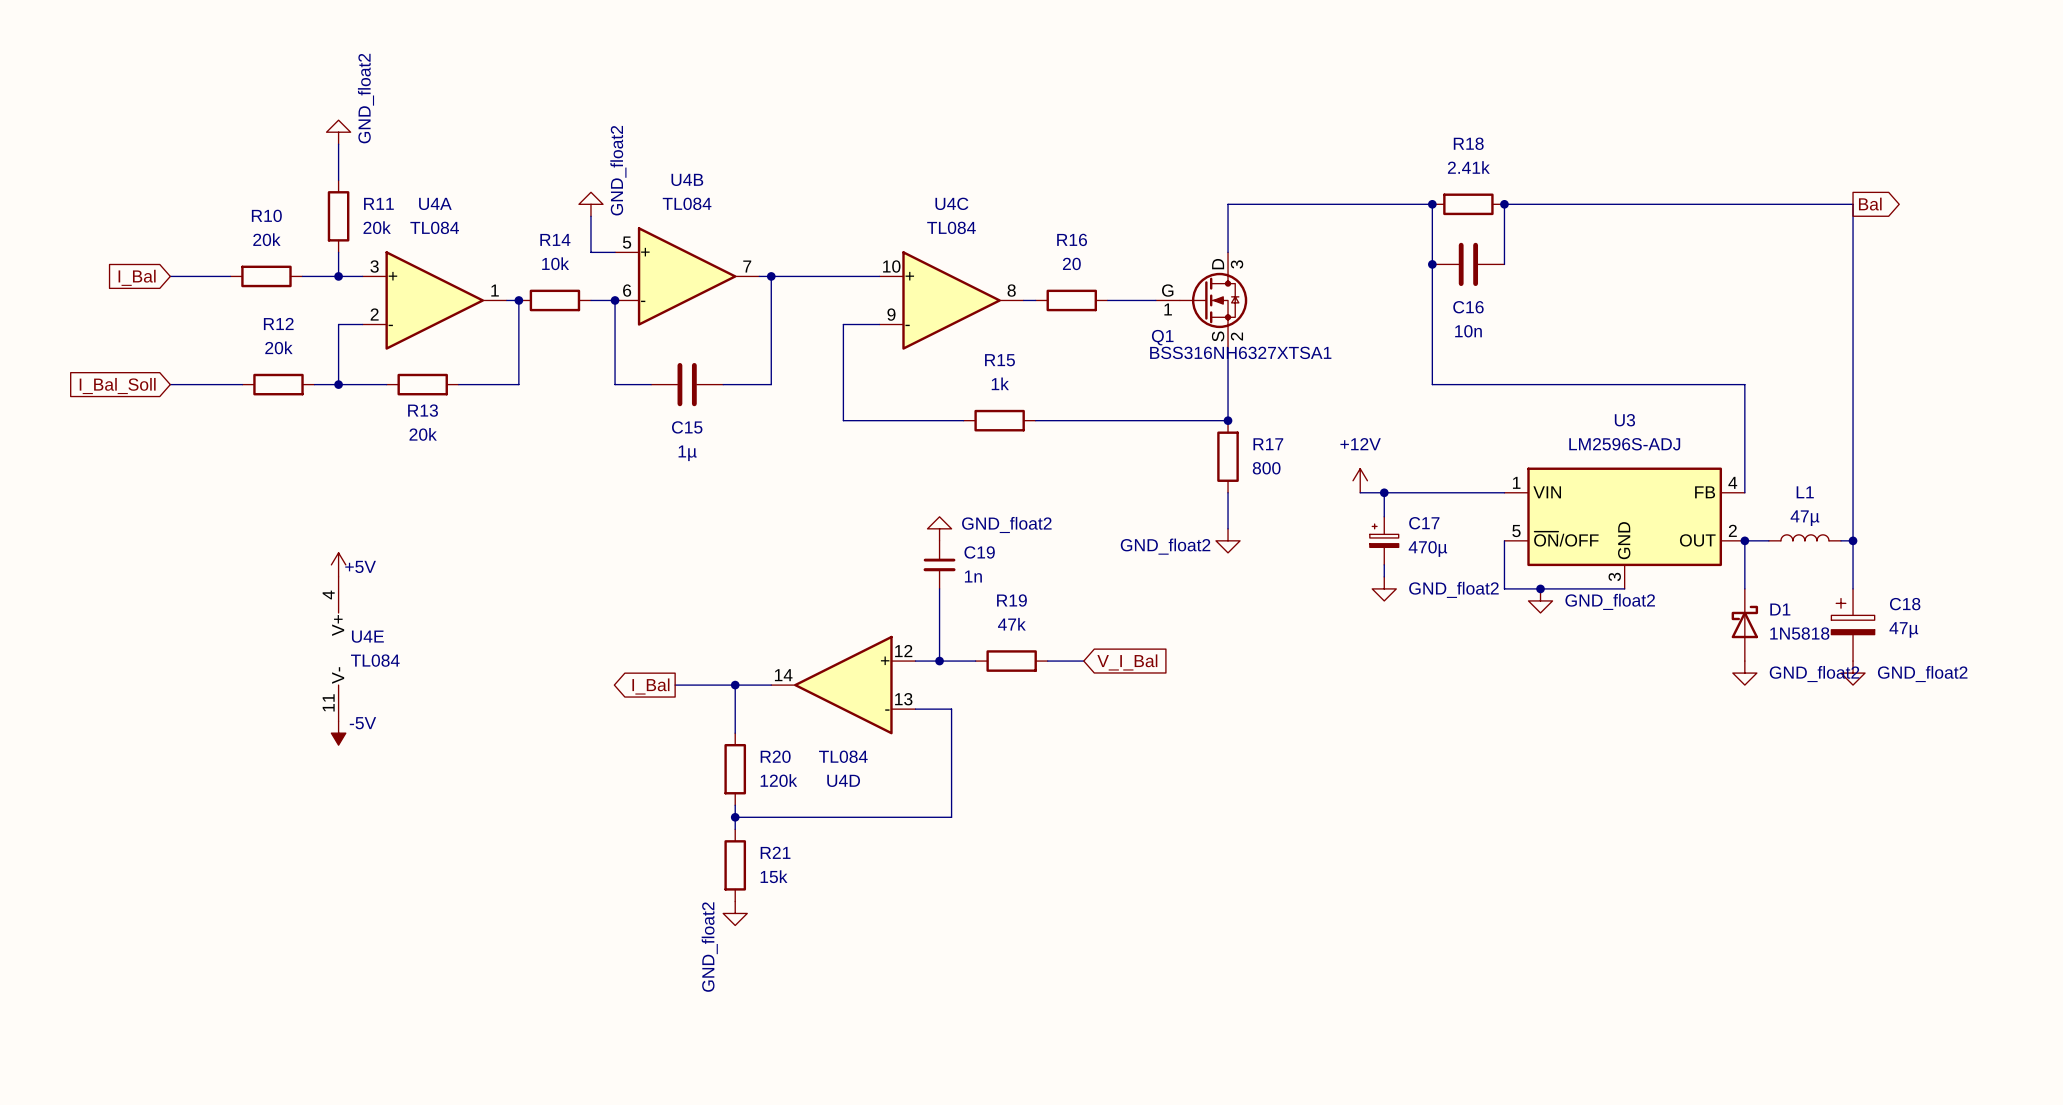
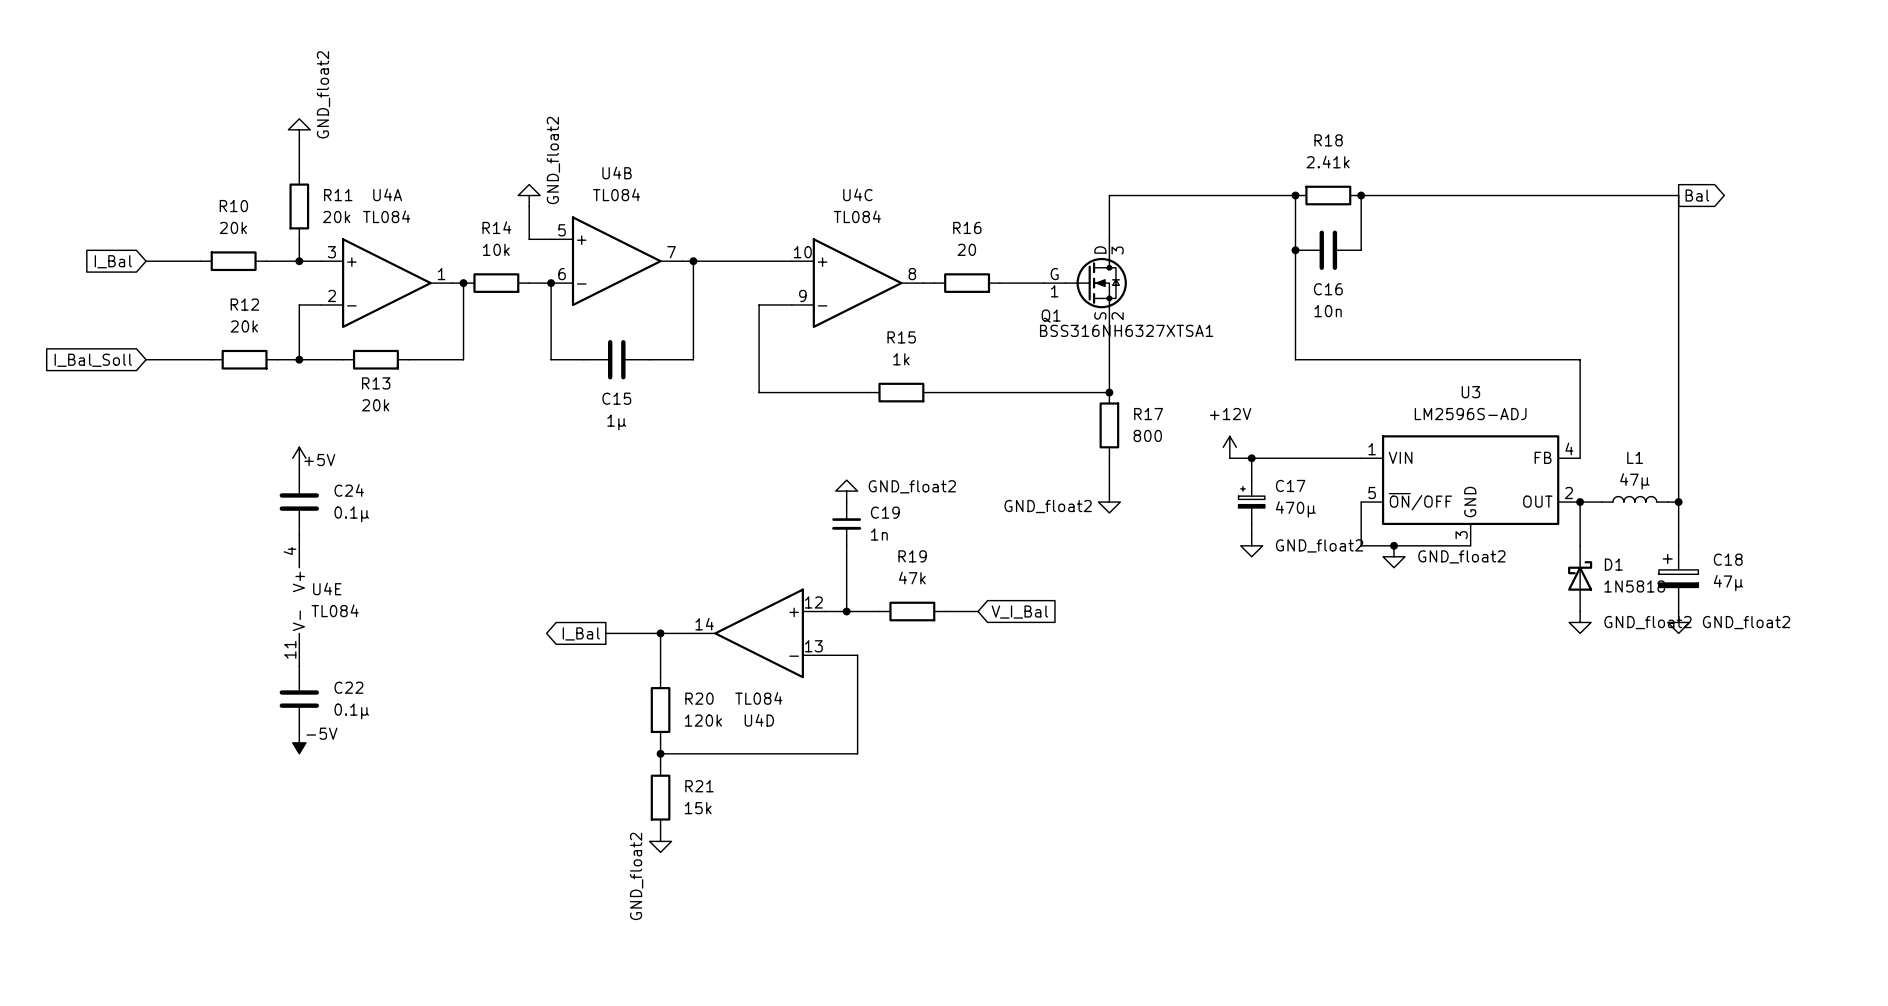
C24: none -> 0.1µ (299, 502)
power symbol position: +5V (338, 564) -> +5V (299, 458)
power symbol position: -5V (338, 733) -> -5V (299, 742)
C22: none -> 0.1µ (299, 699)

